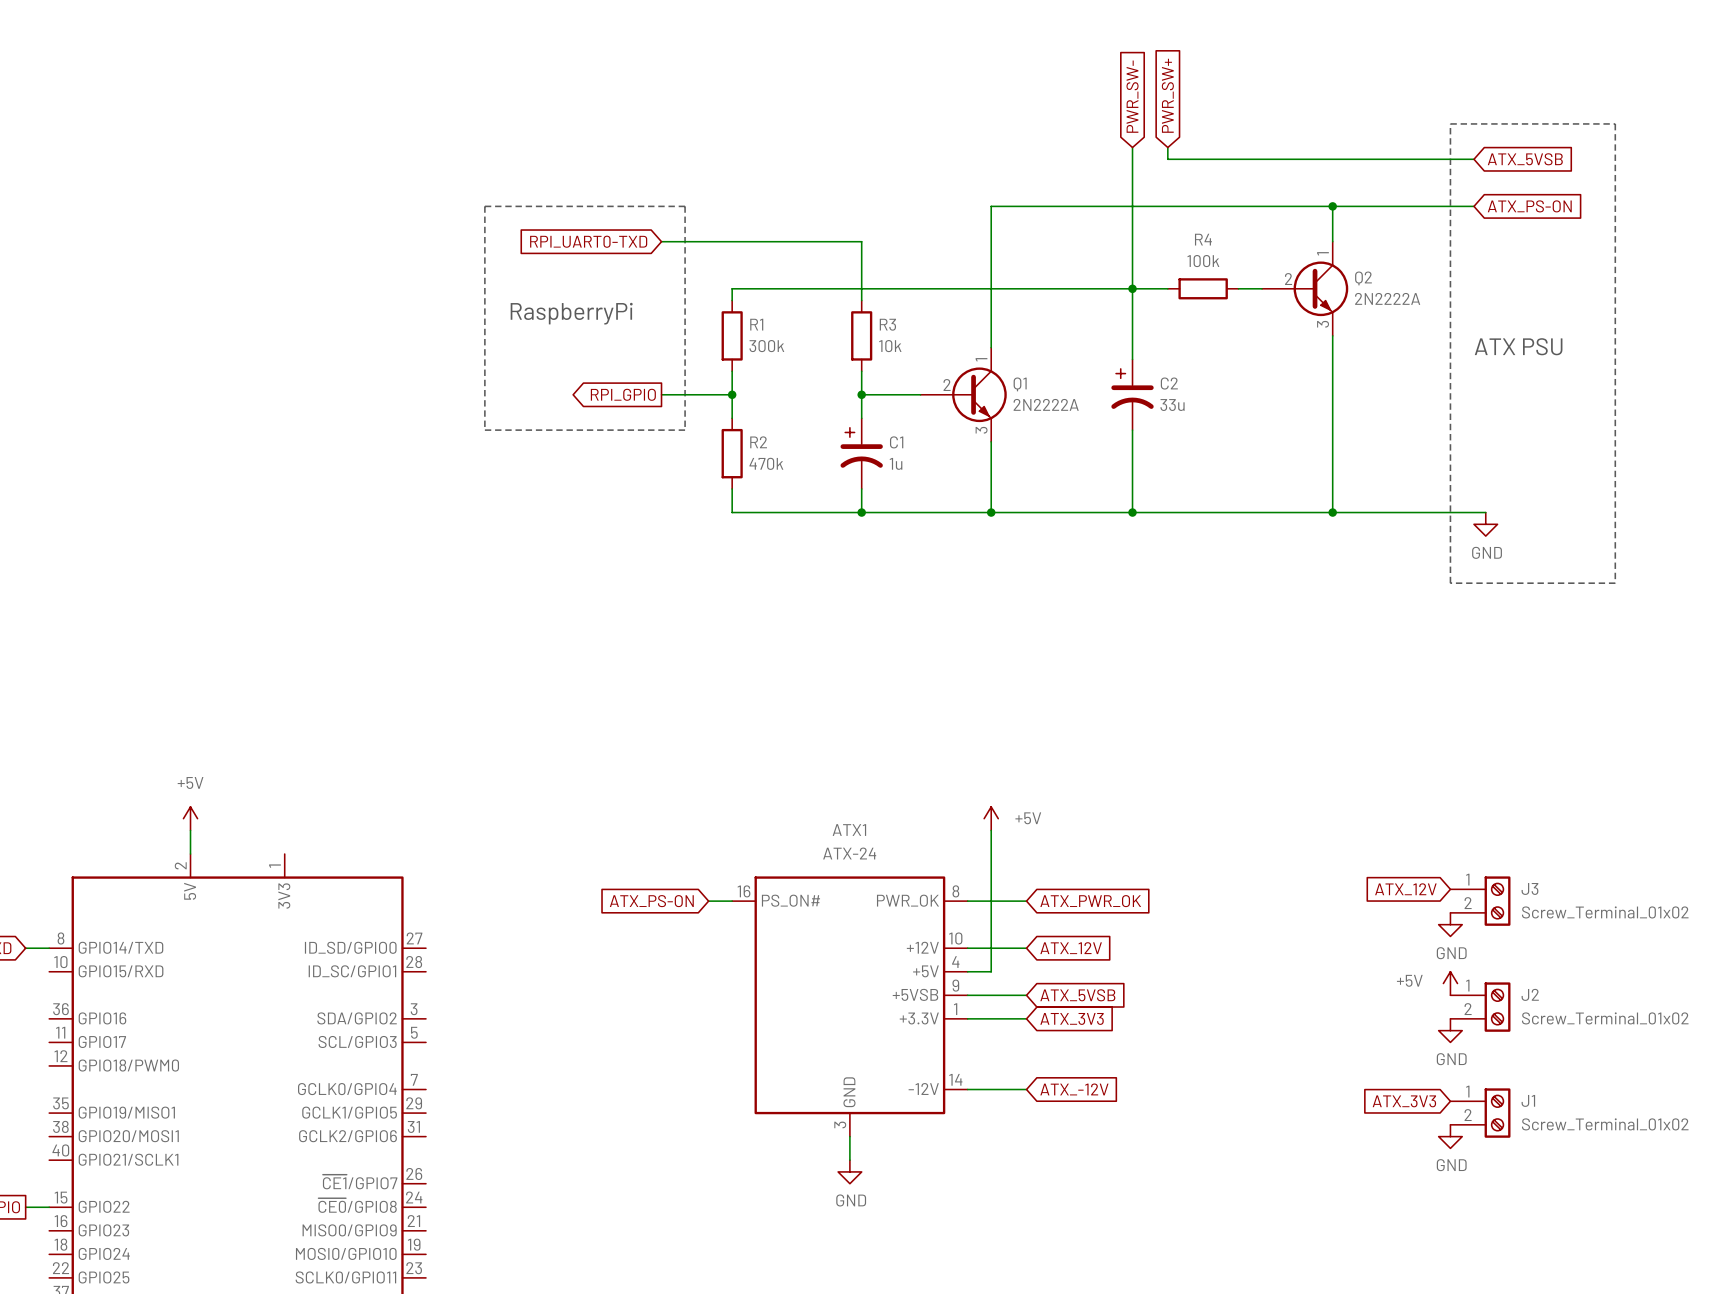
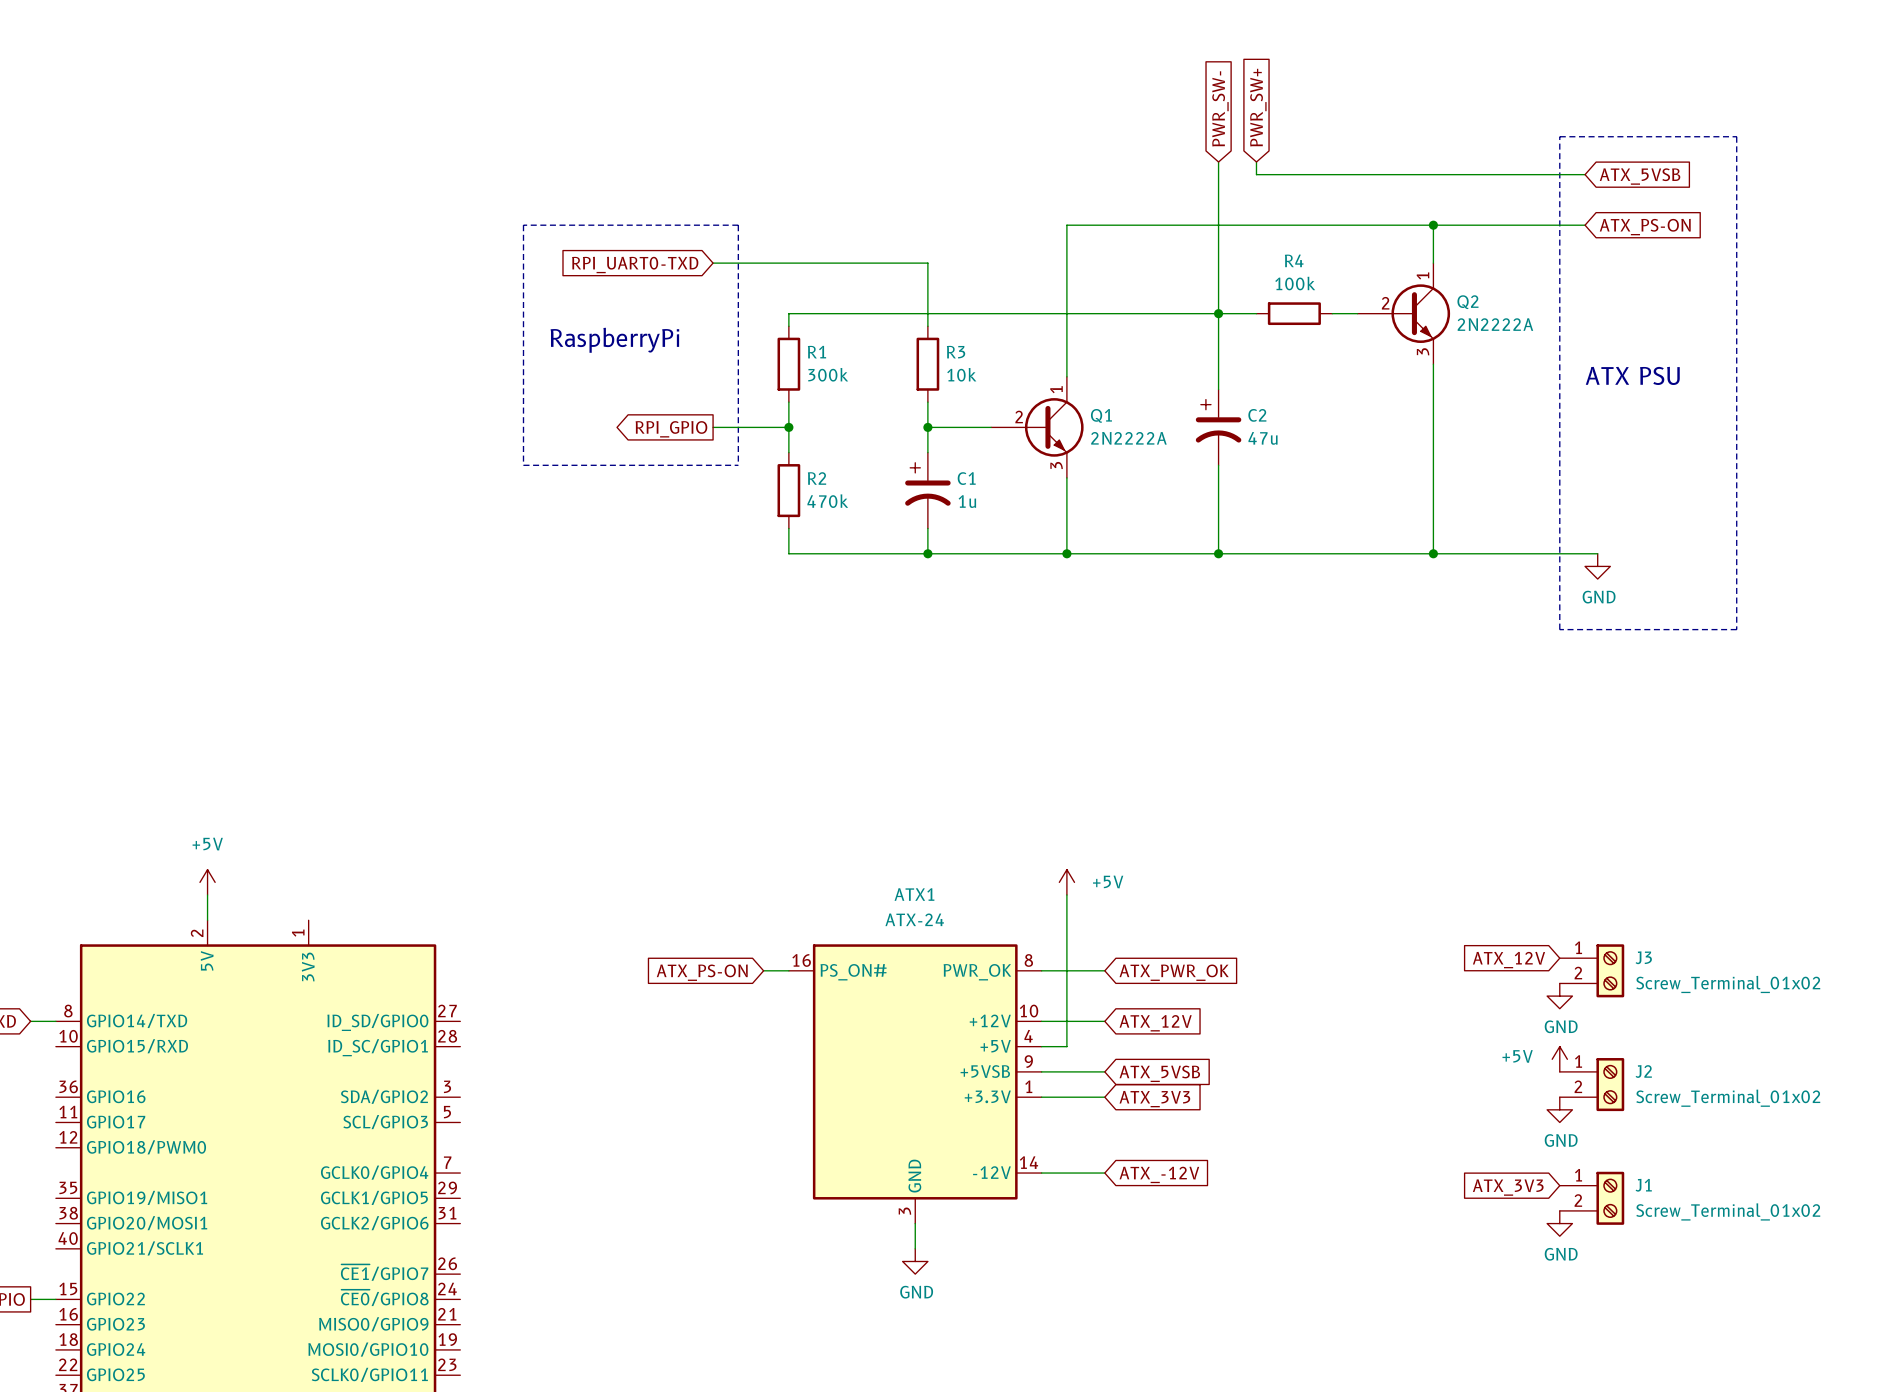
C2 value: 33u (1172, 405) -> 47u (1263, 438)

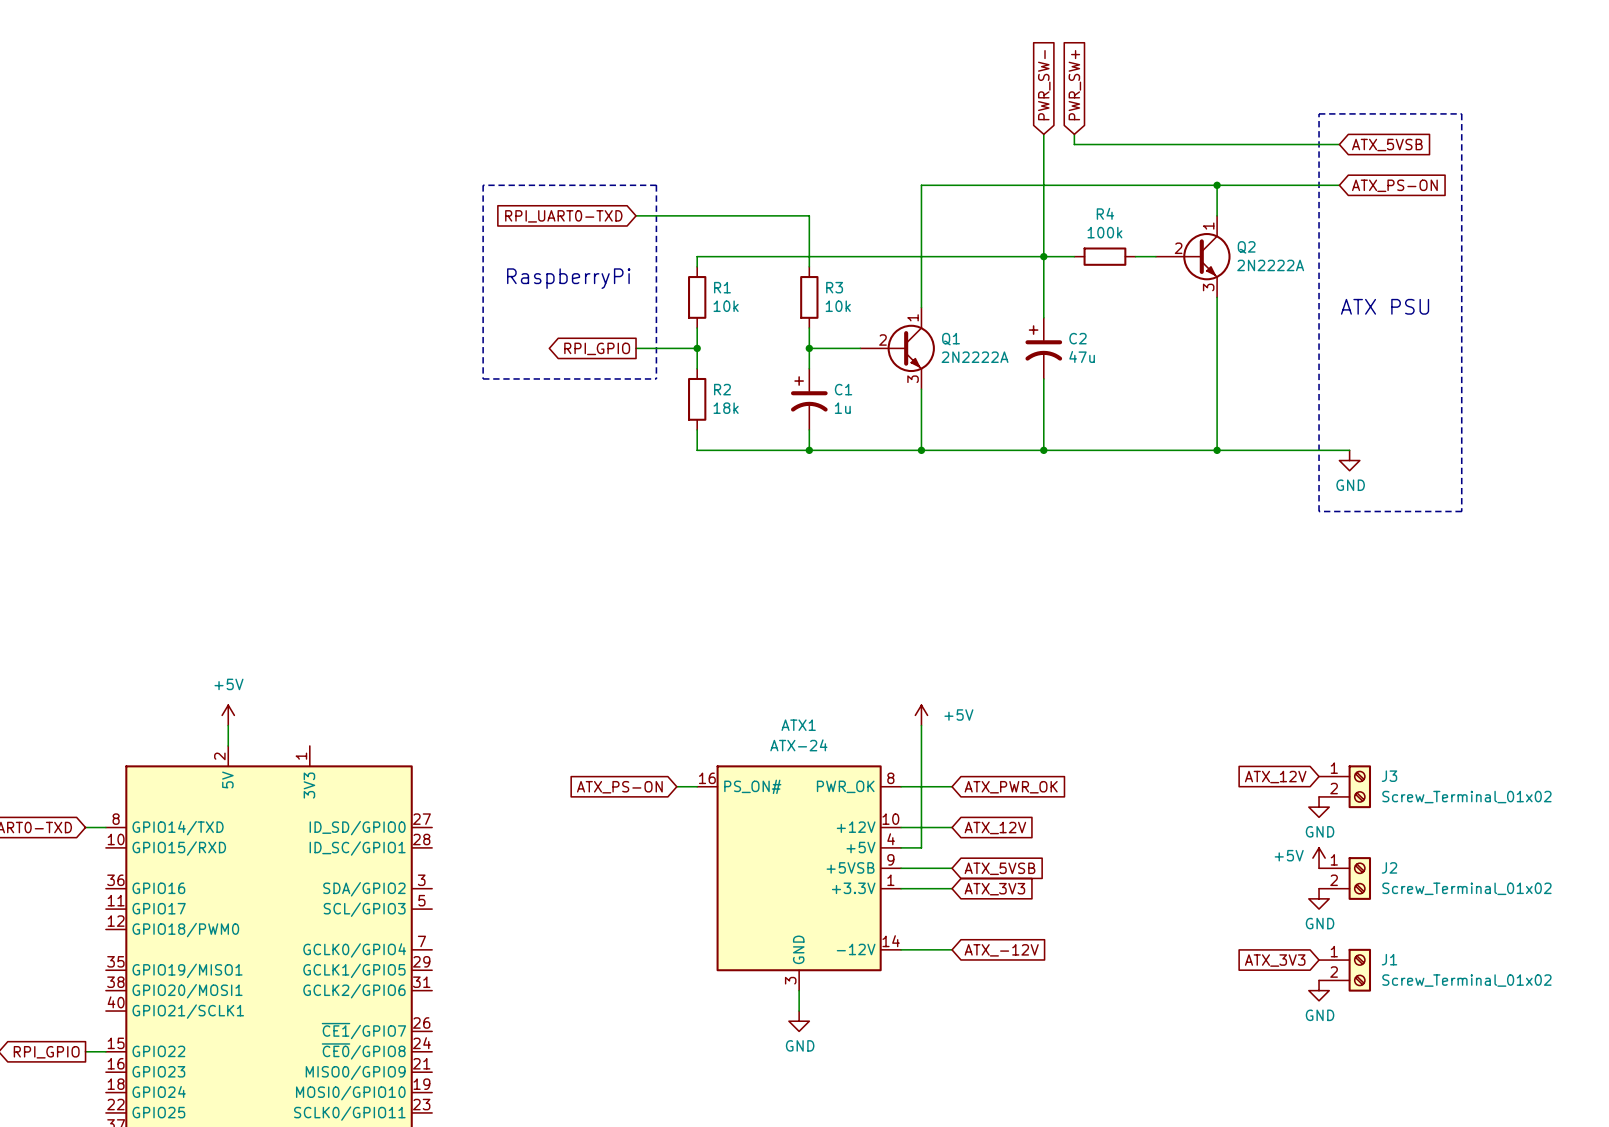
R1 value: 300k (828, 374) -> 10k (726, 306)
R2 value: 470k (827, 501) -> 18k (726, 408)

